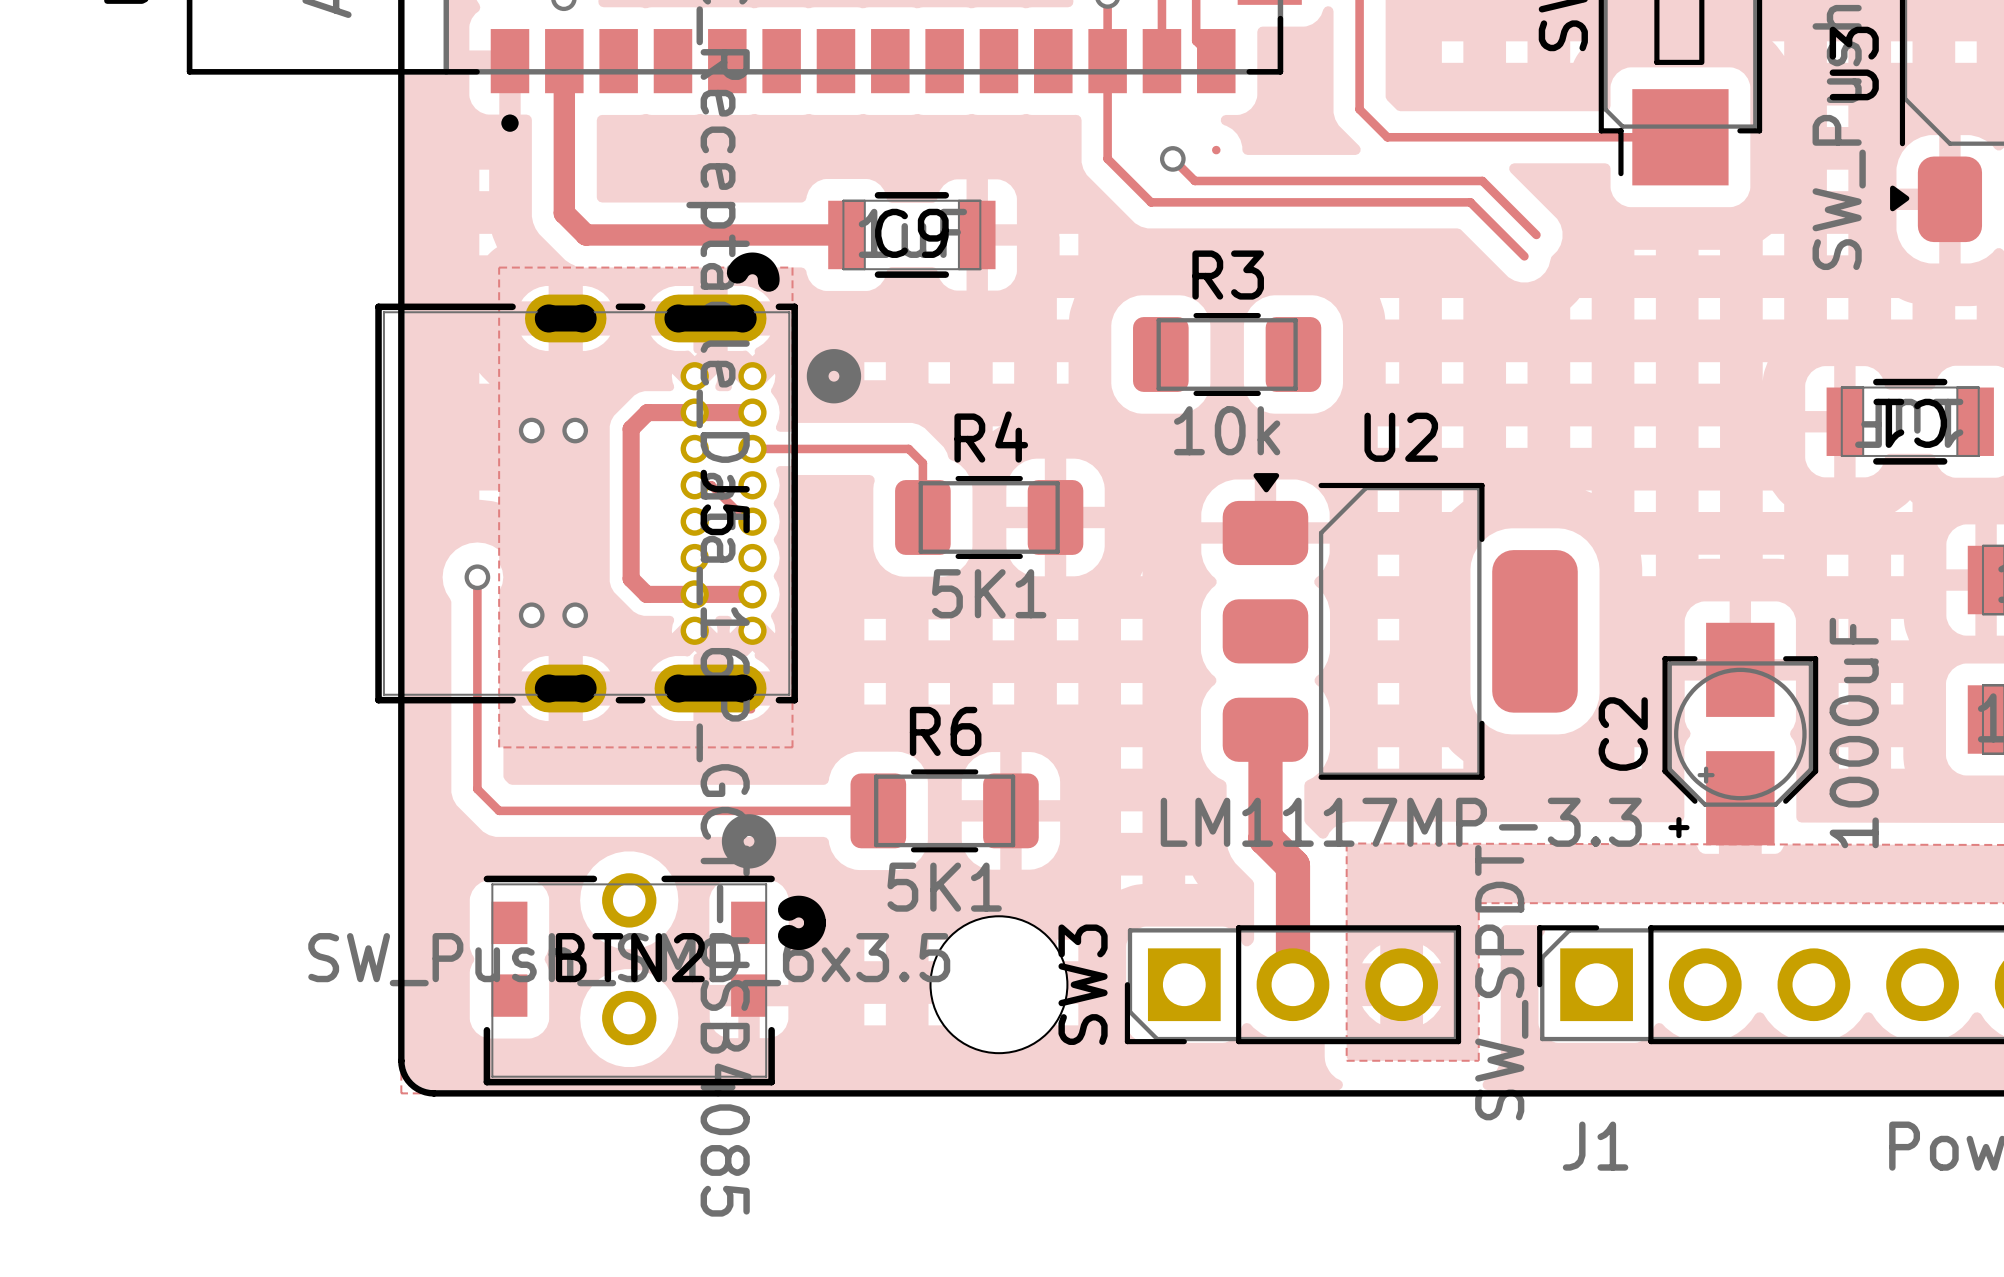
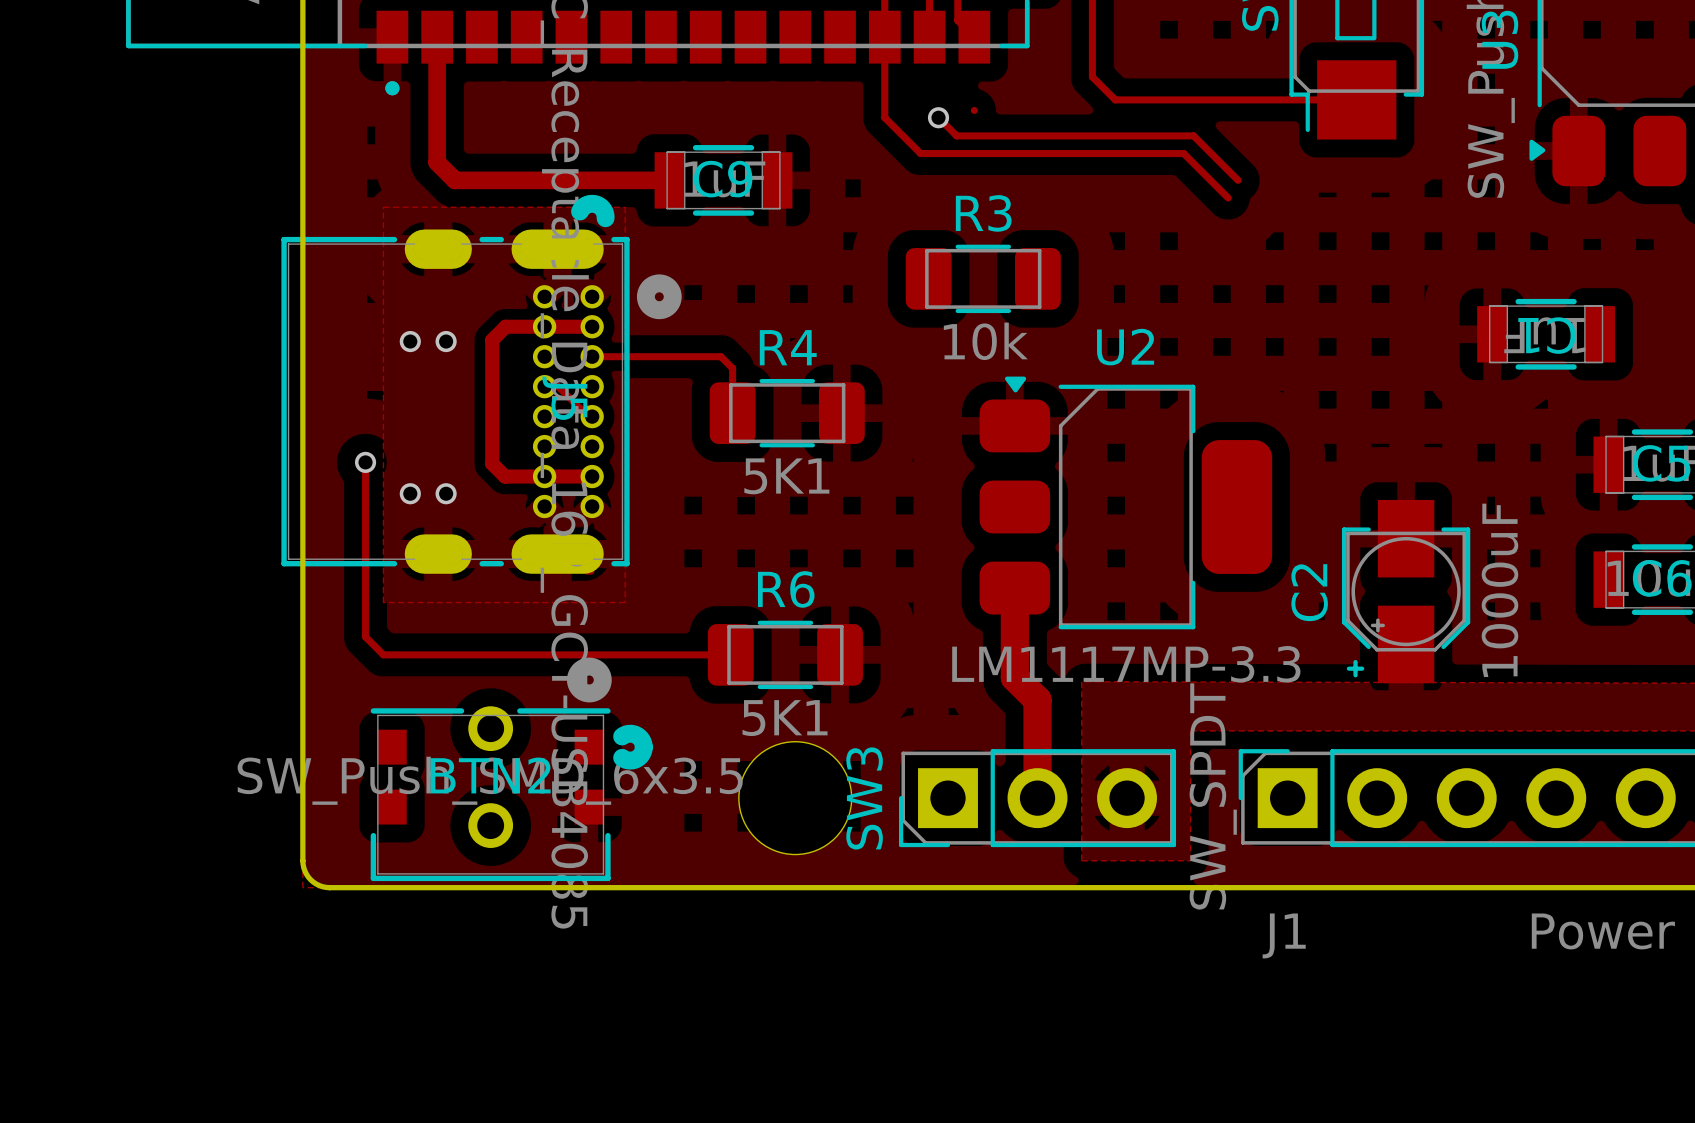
R6 position: (944, 810) -> (785, 654)

